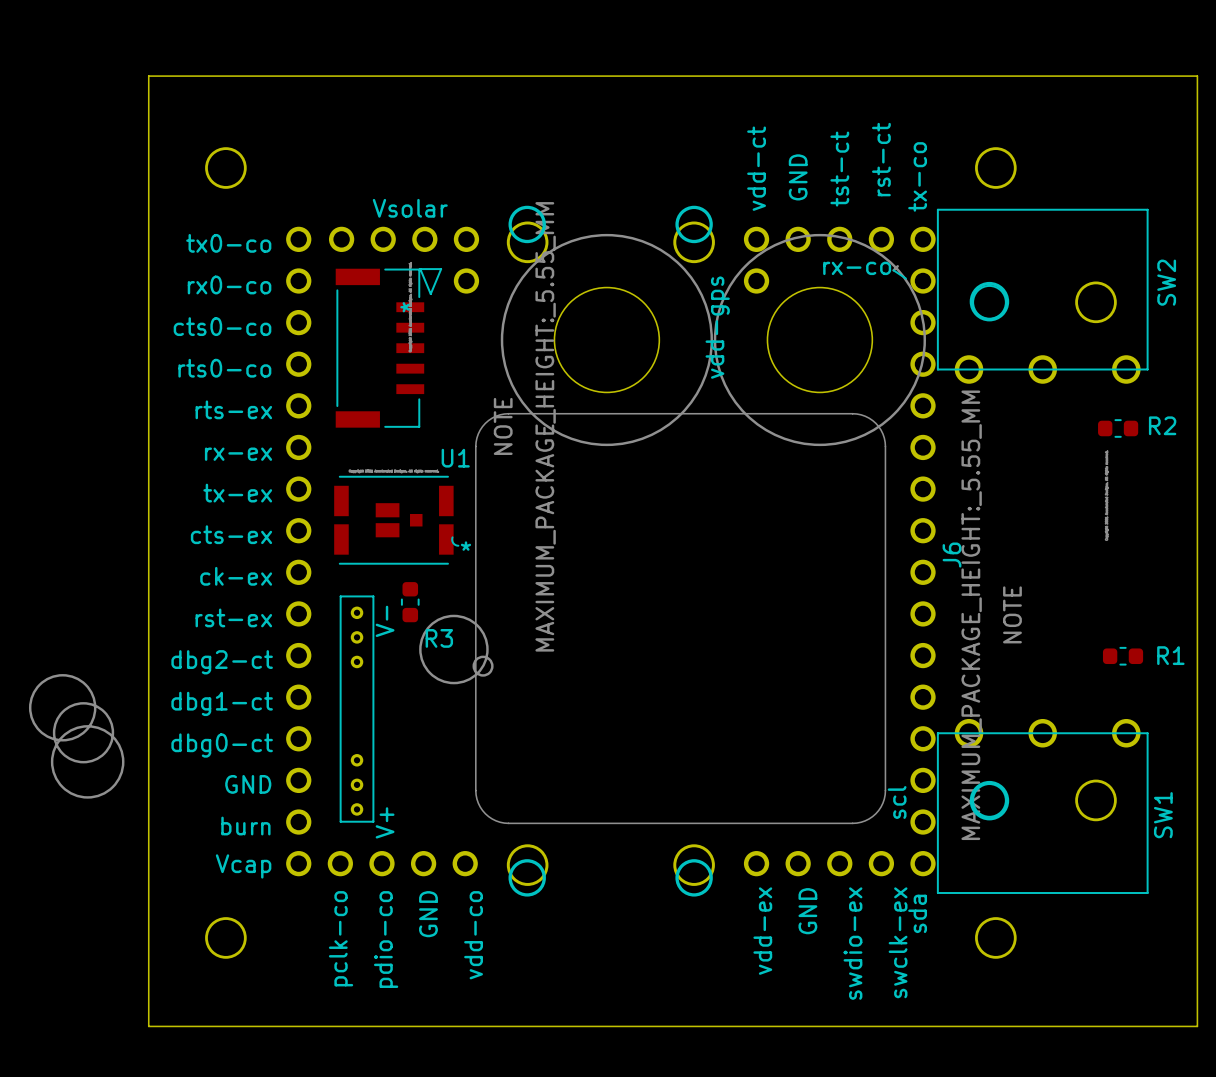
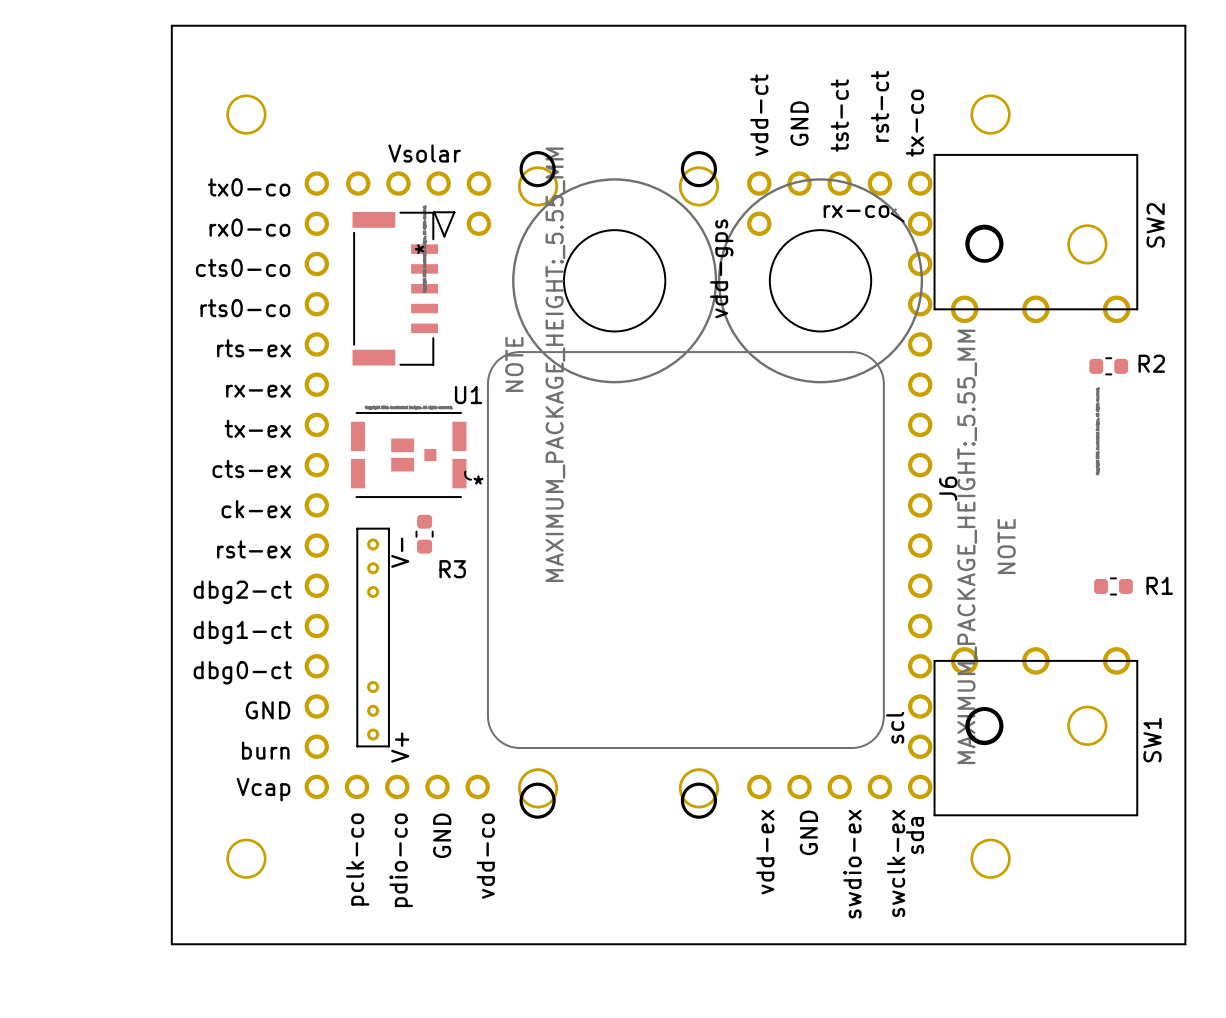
drawing: [419, 614, 494, 685] -> none
drawing: [28, 674, 125, 799] -> none

